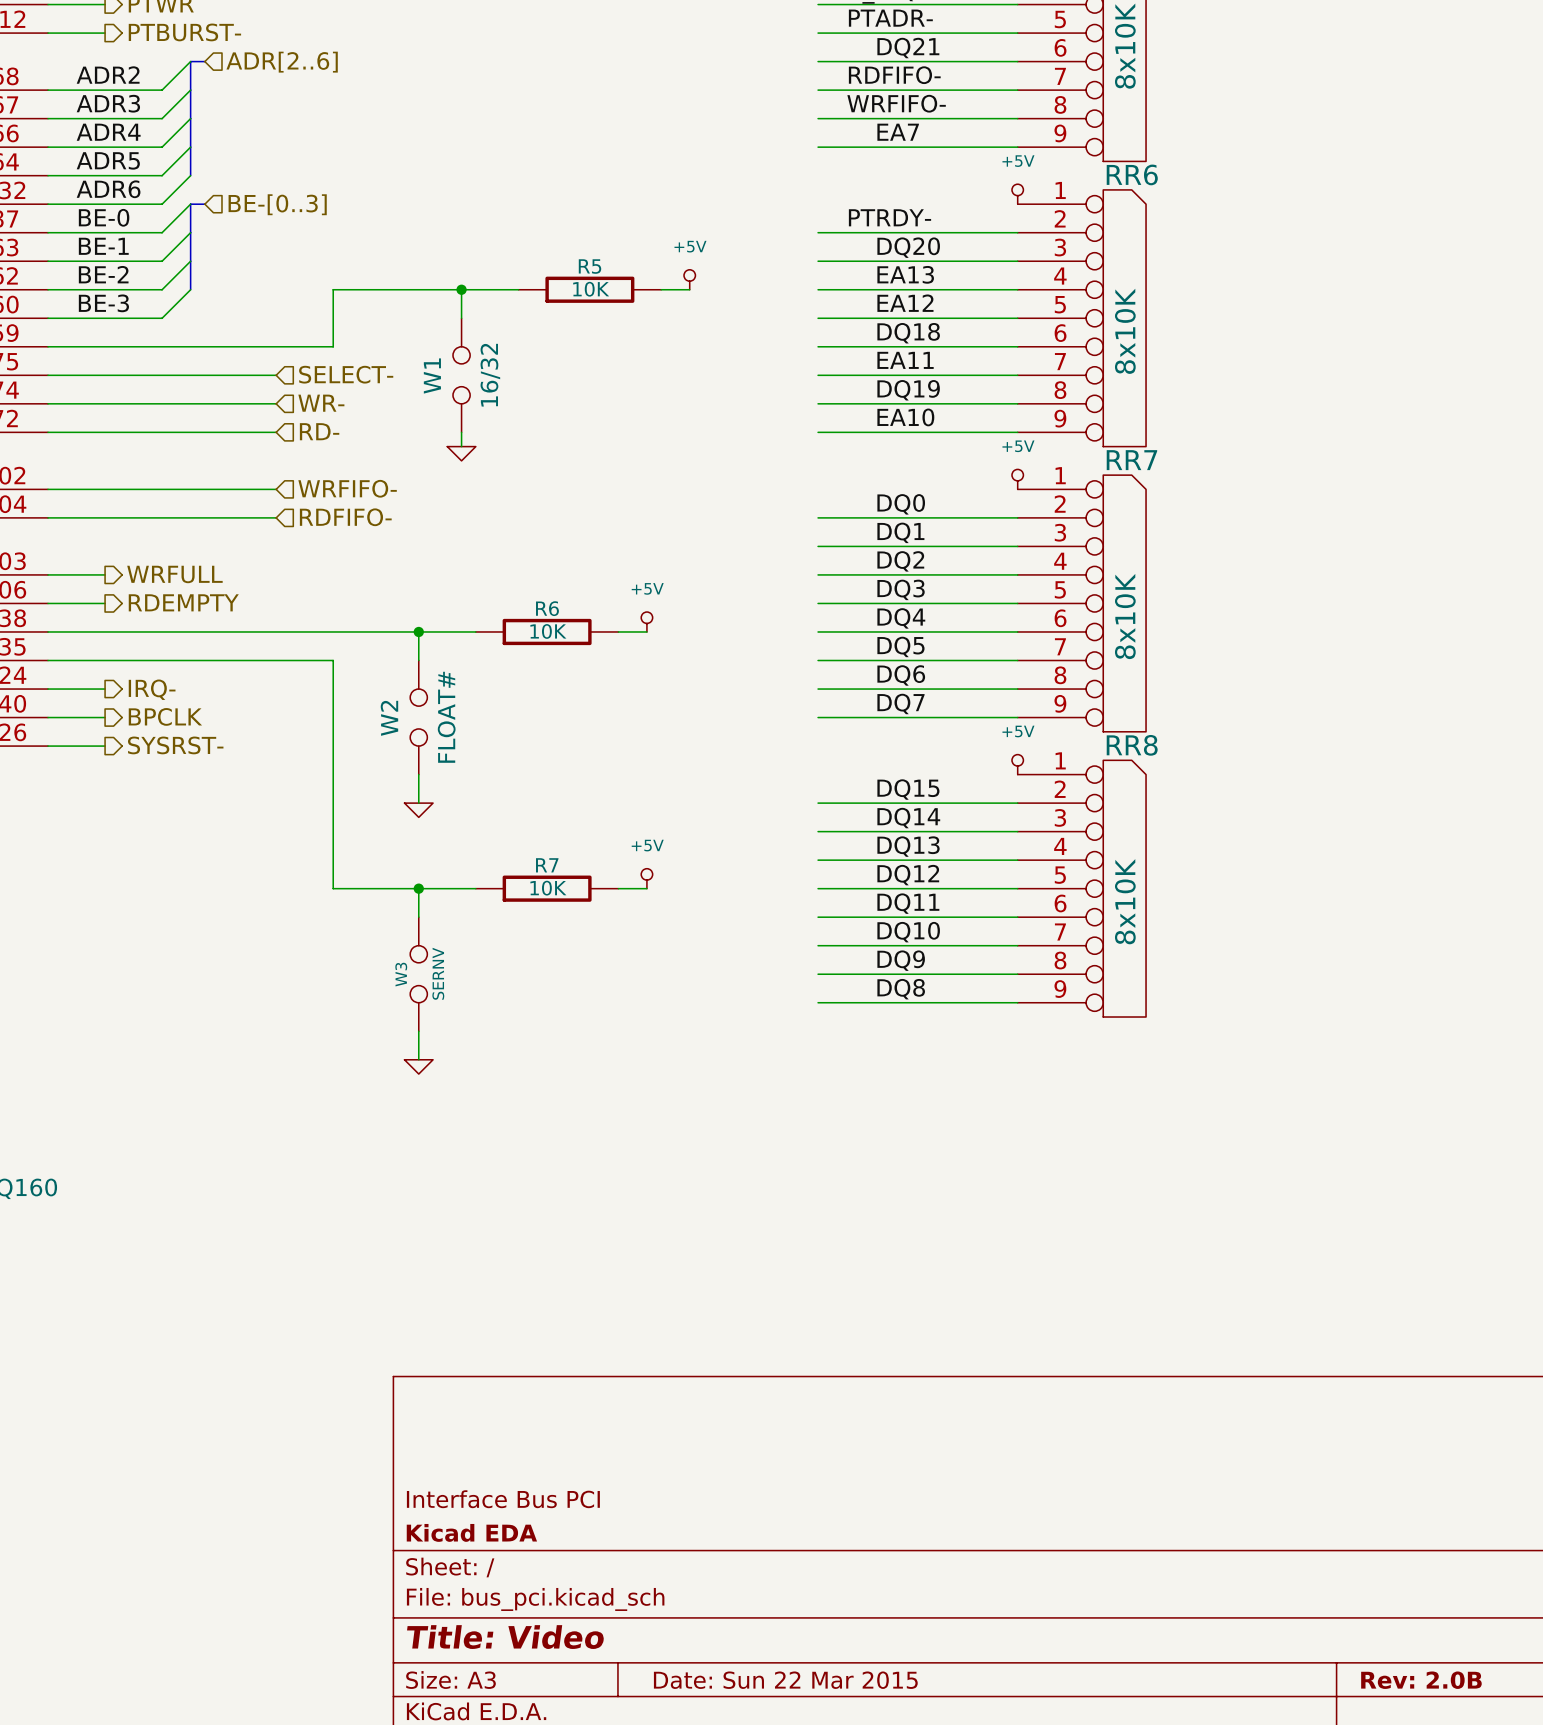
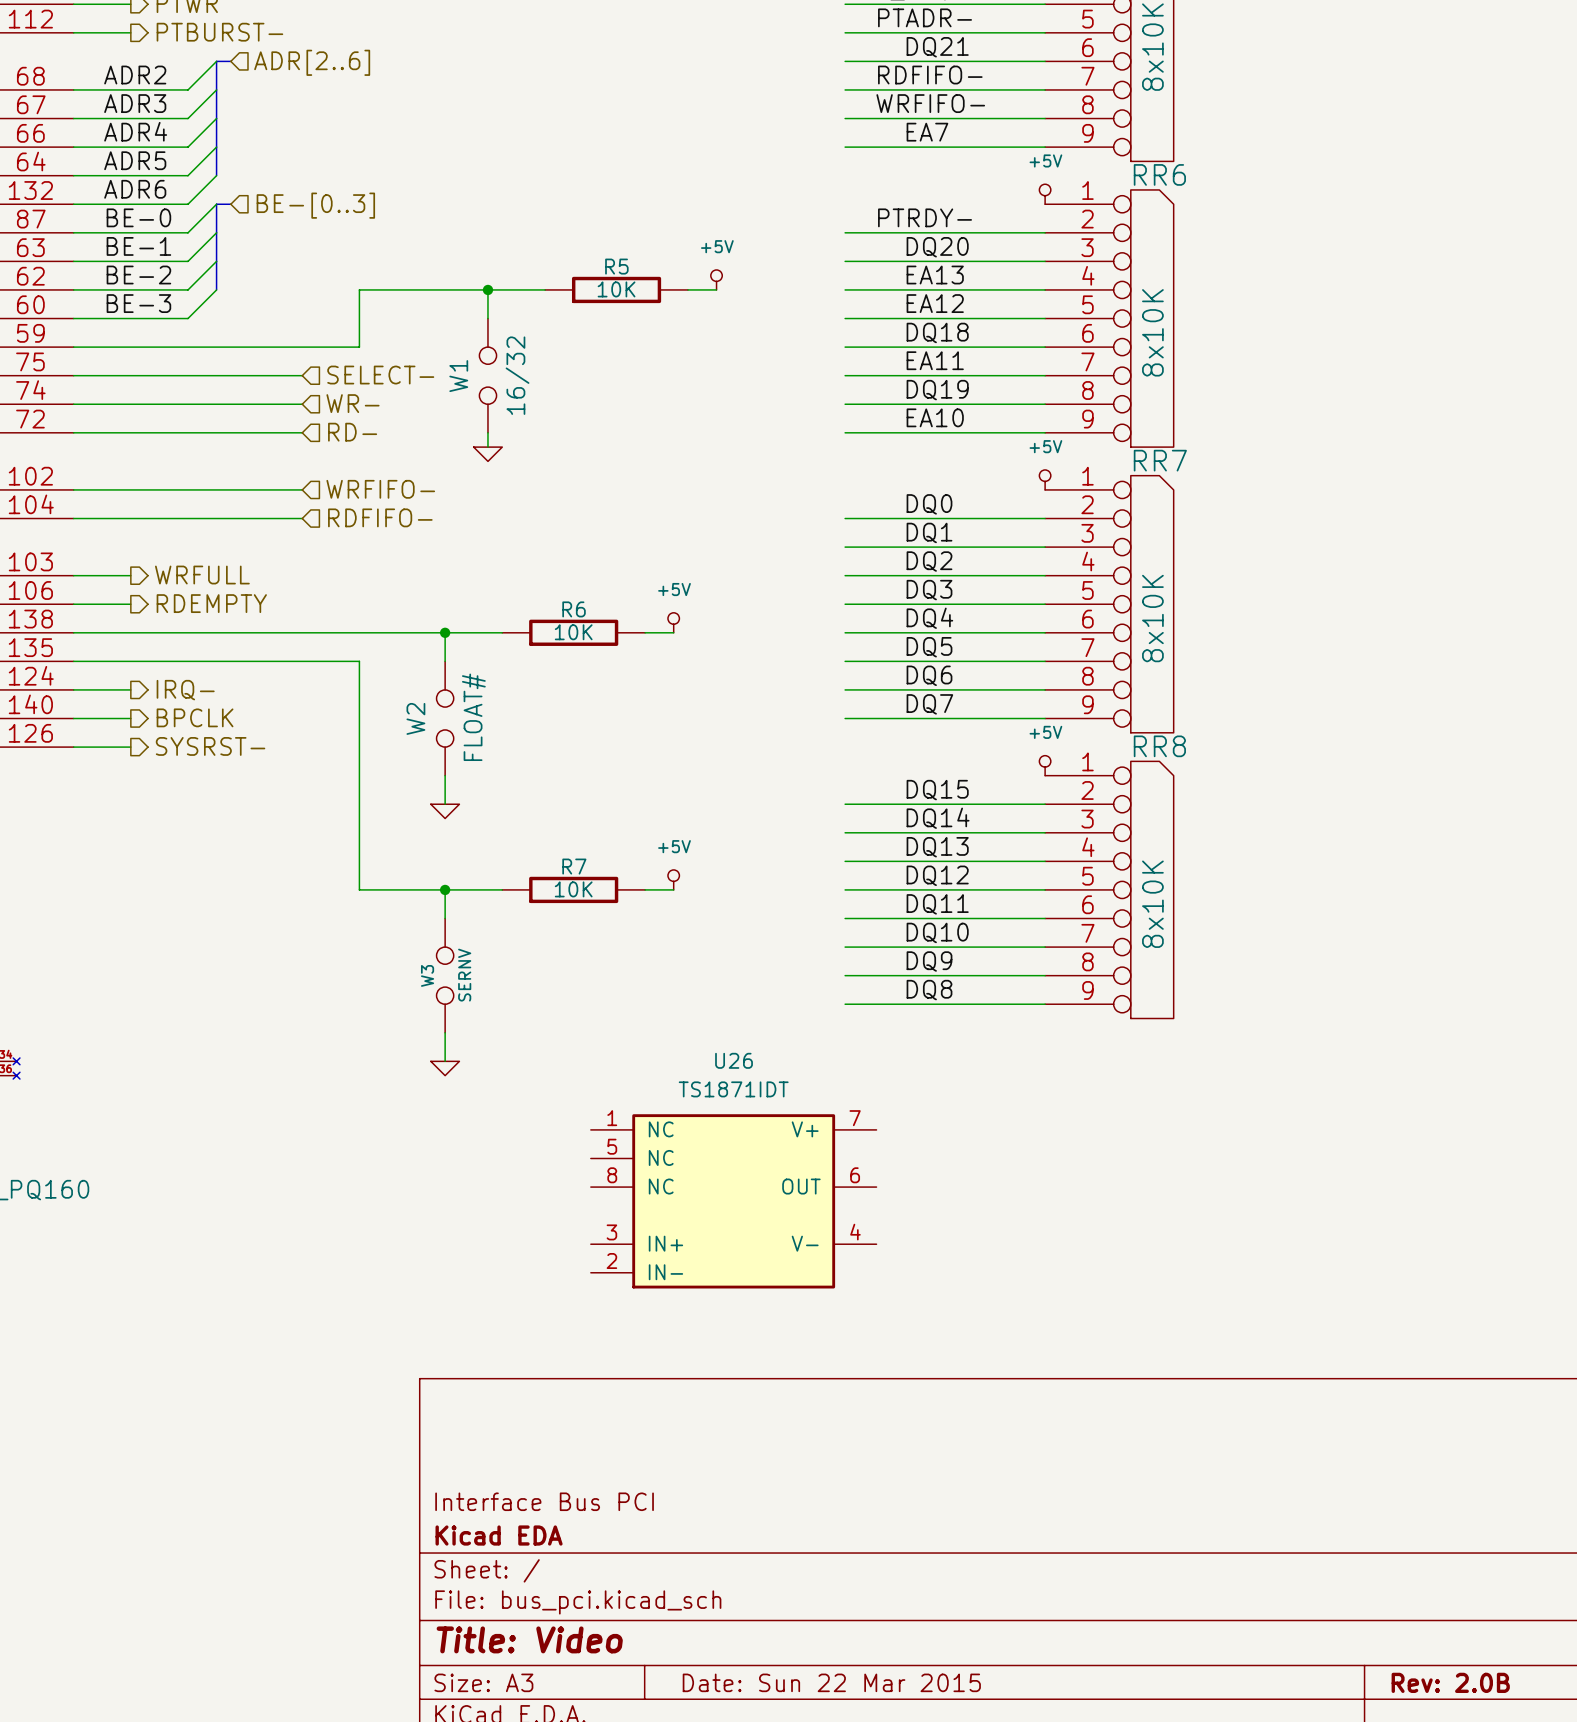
U26: none -> TS1871IDT (733, 1201)

